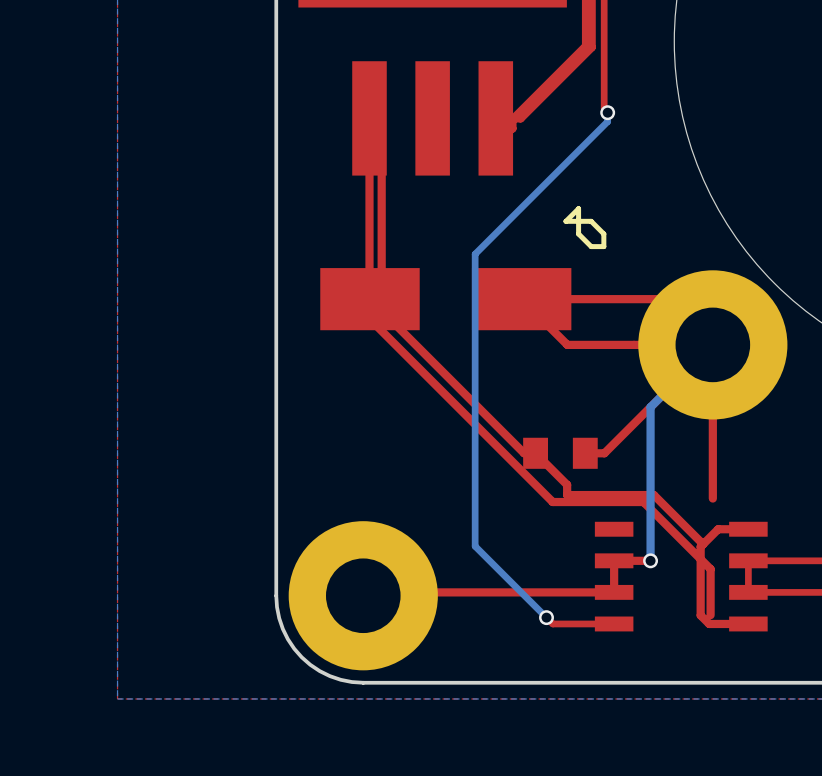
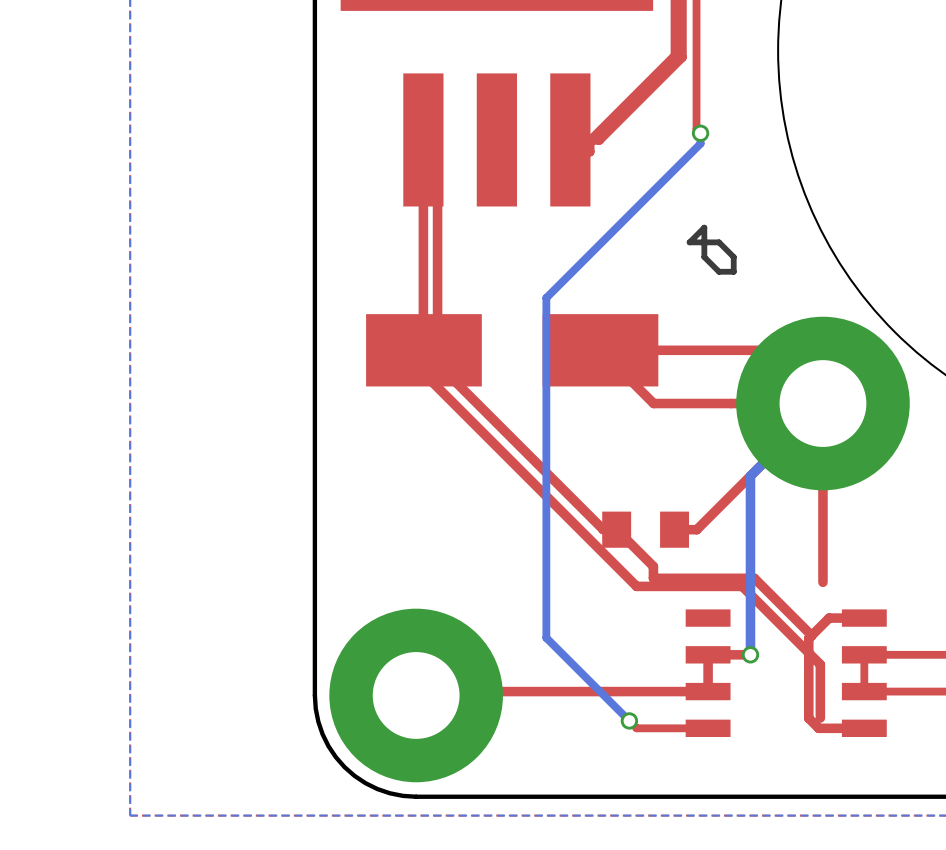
line: (578, 208) (578, 233) (591, 246) (603, 246) (603, 233) (591, 221) (565, 221) (578, 208) -> (704, 227) (704, 257) (719, 271) (733, 271) (733, 257) (719, 242) (689, 242) (704, 227)

